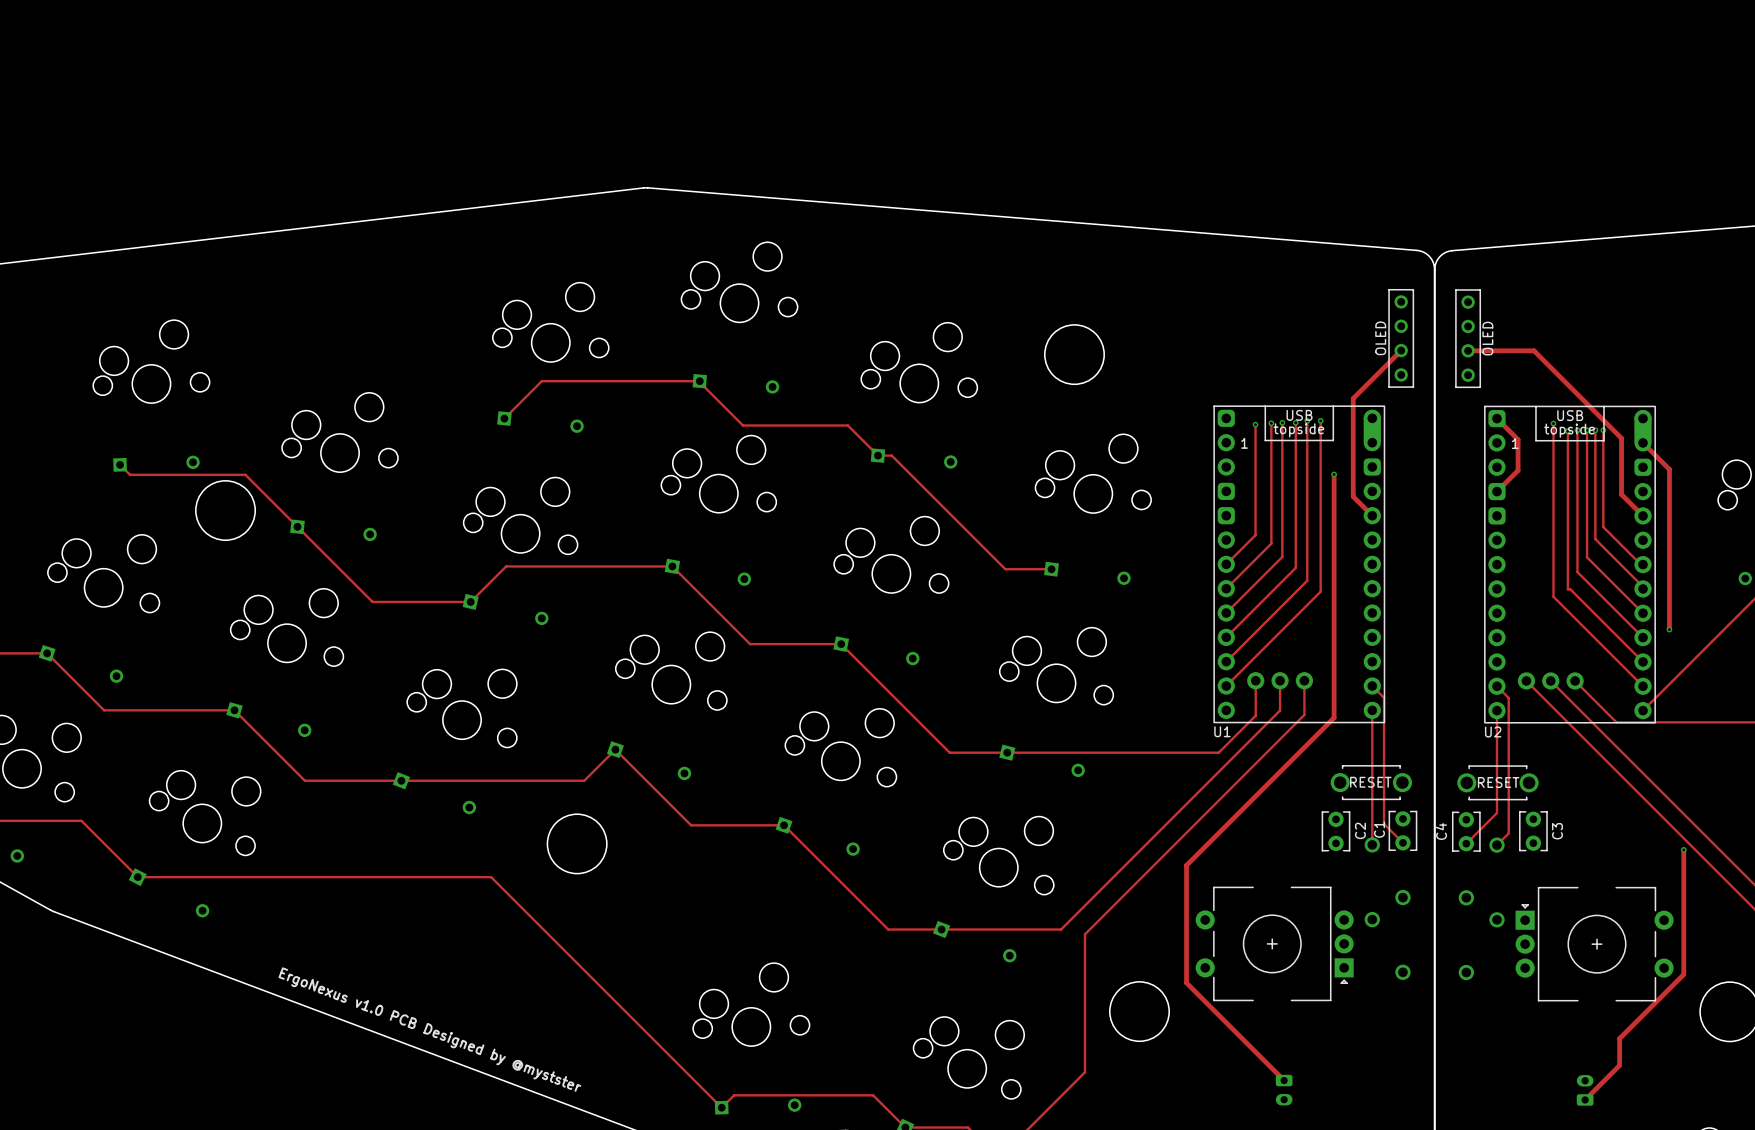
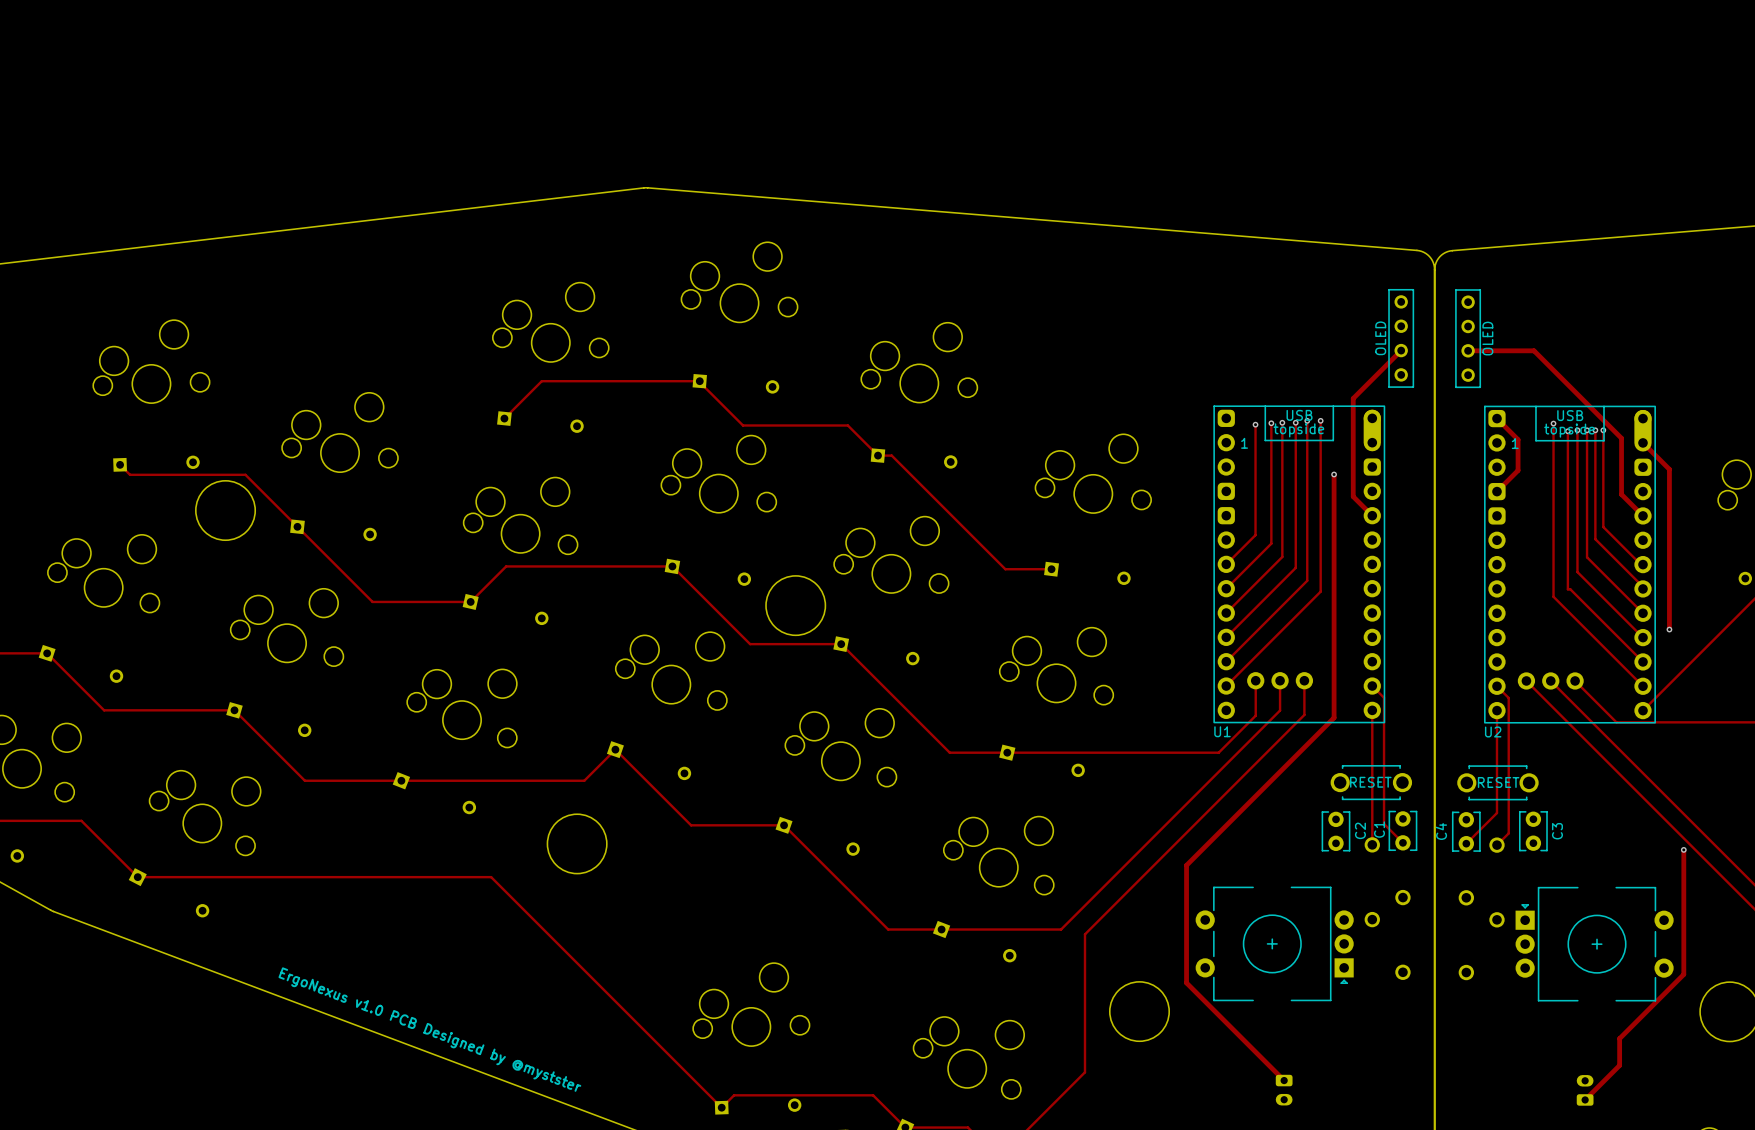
round board edge: [1044, 324, 1105, 385] -> none
round board edge: none -> [765, 575, 826, 636]

